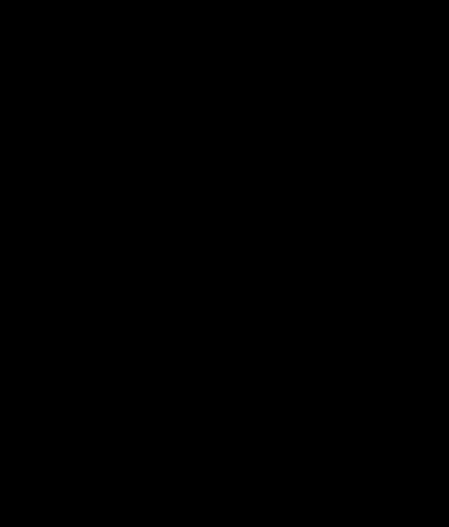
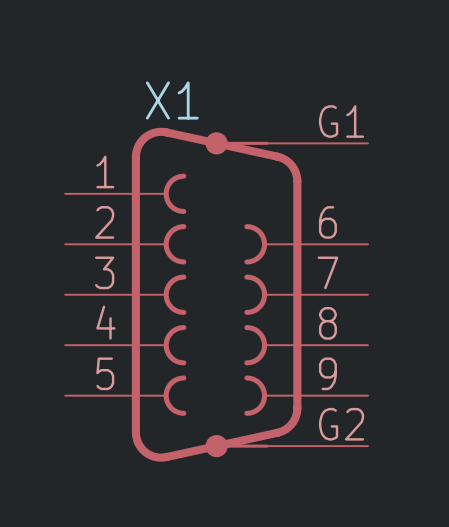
X1: none -> (216, 294)

